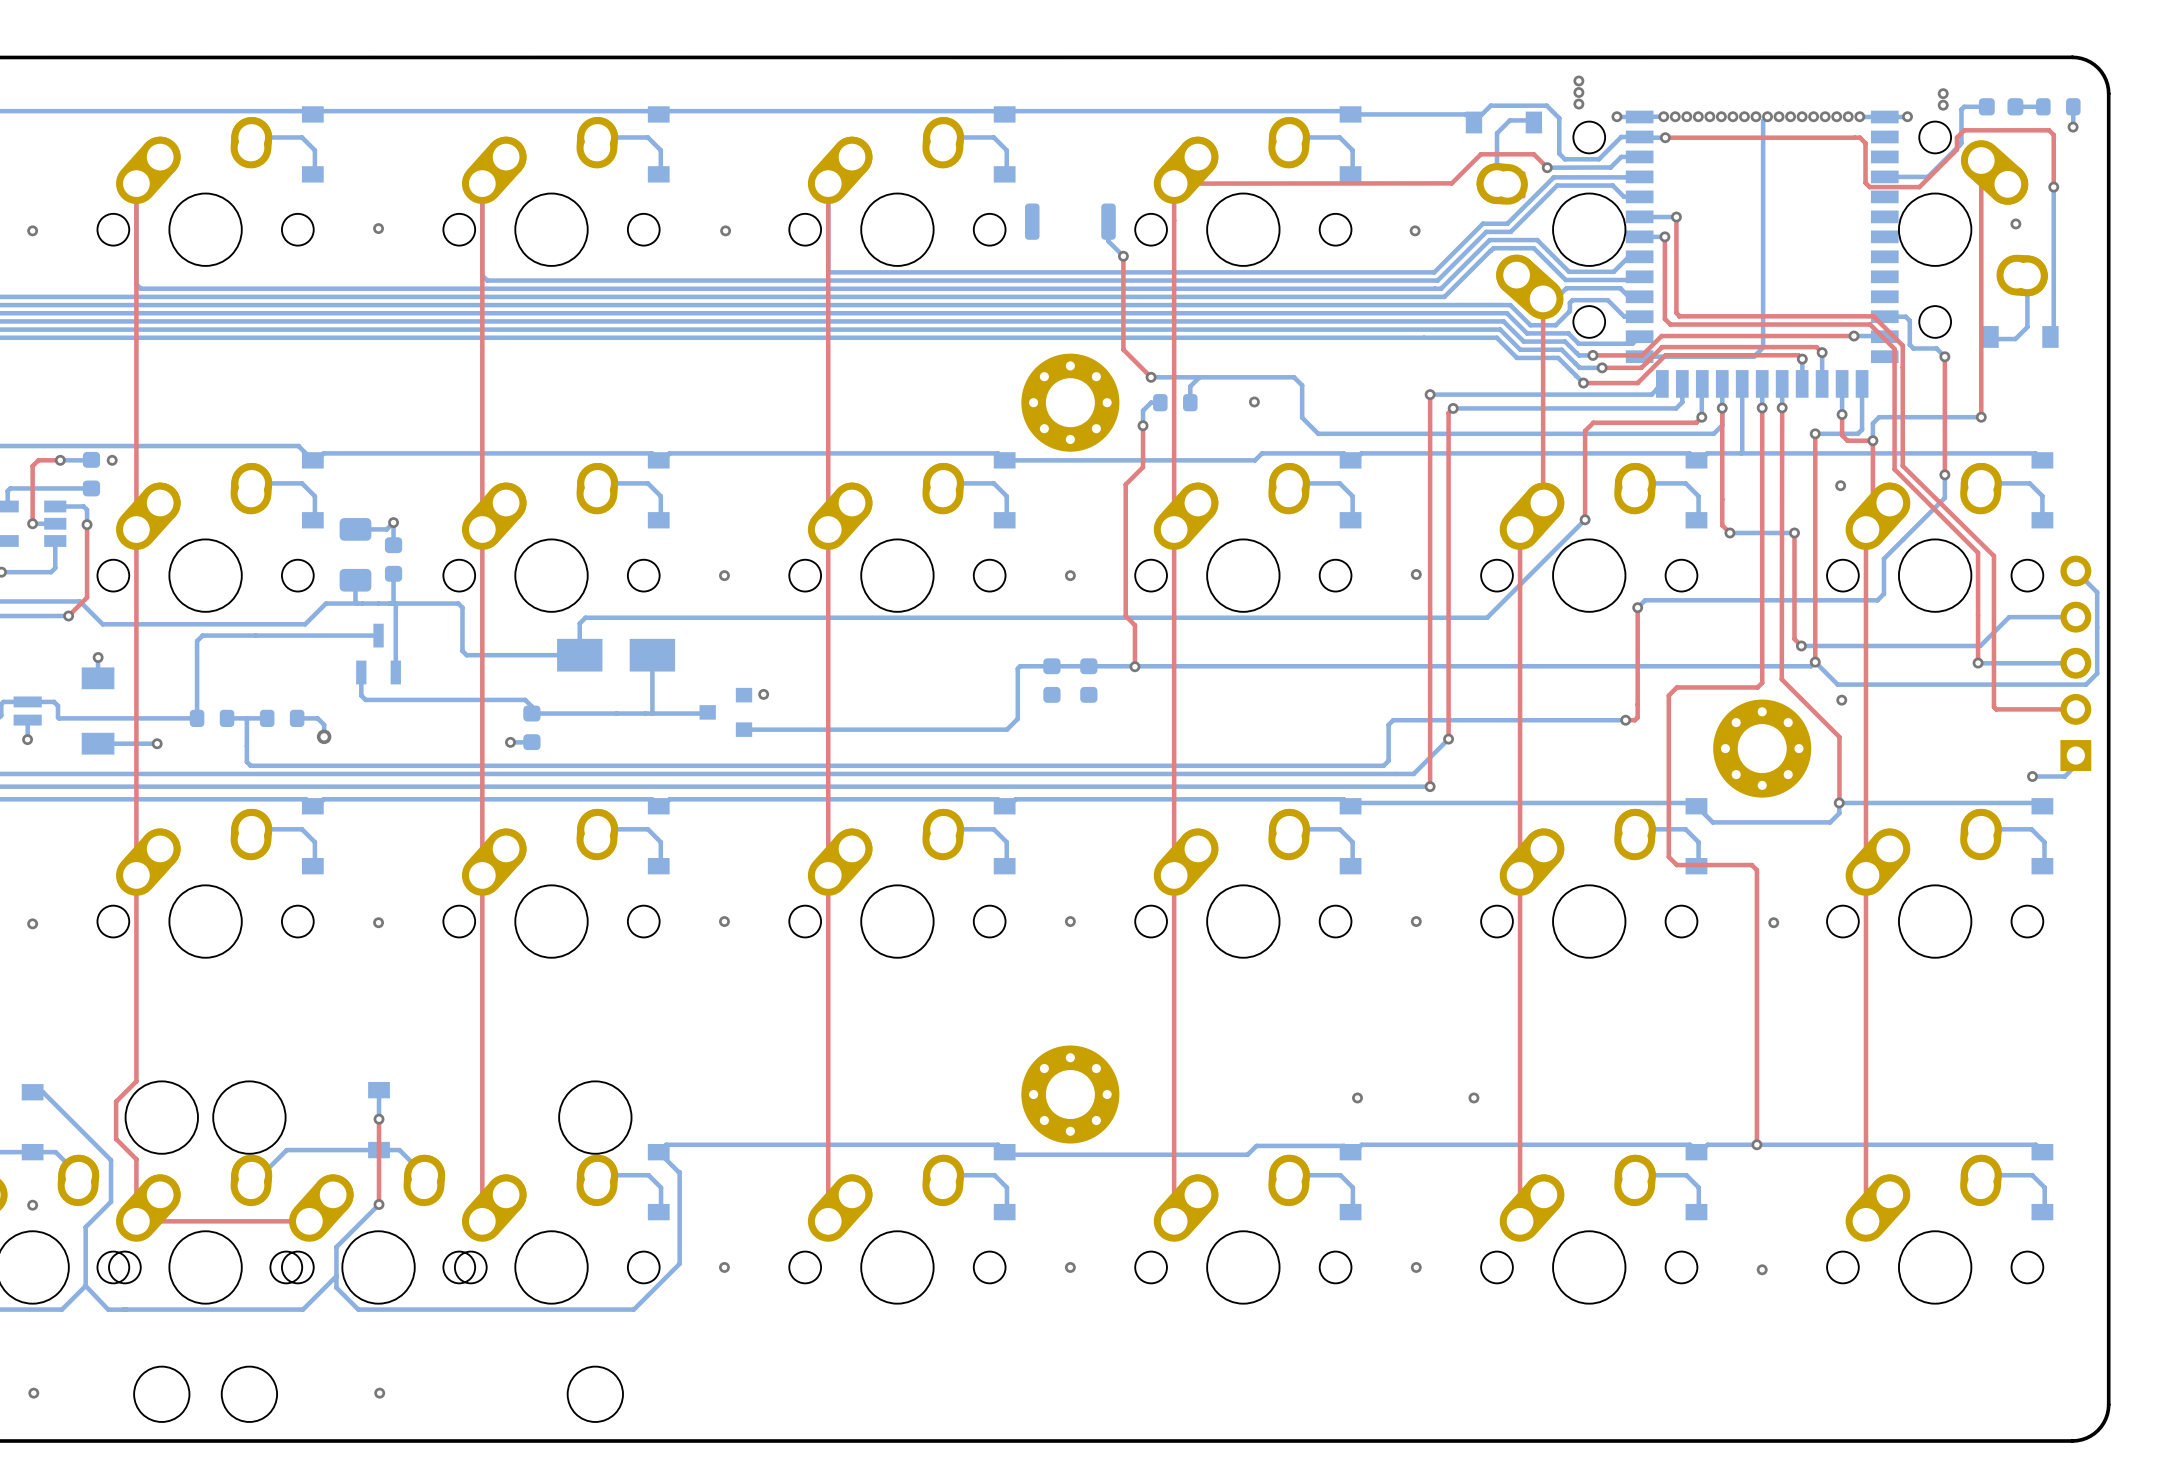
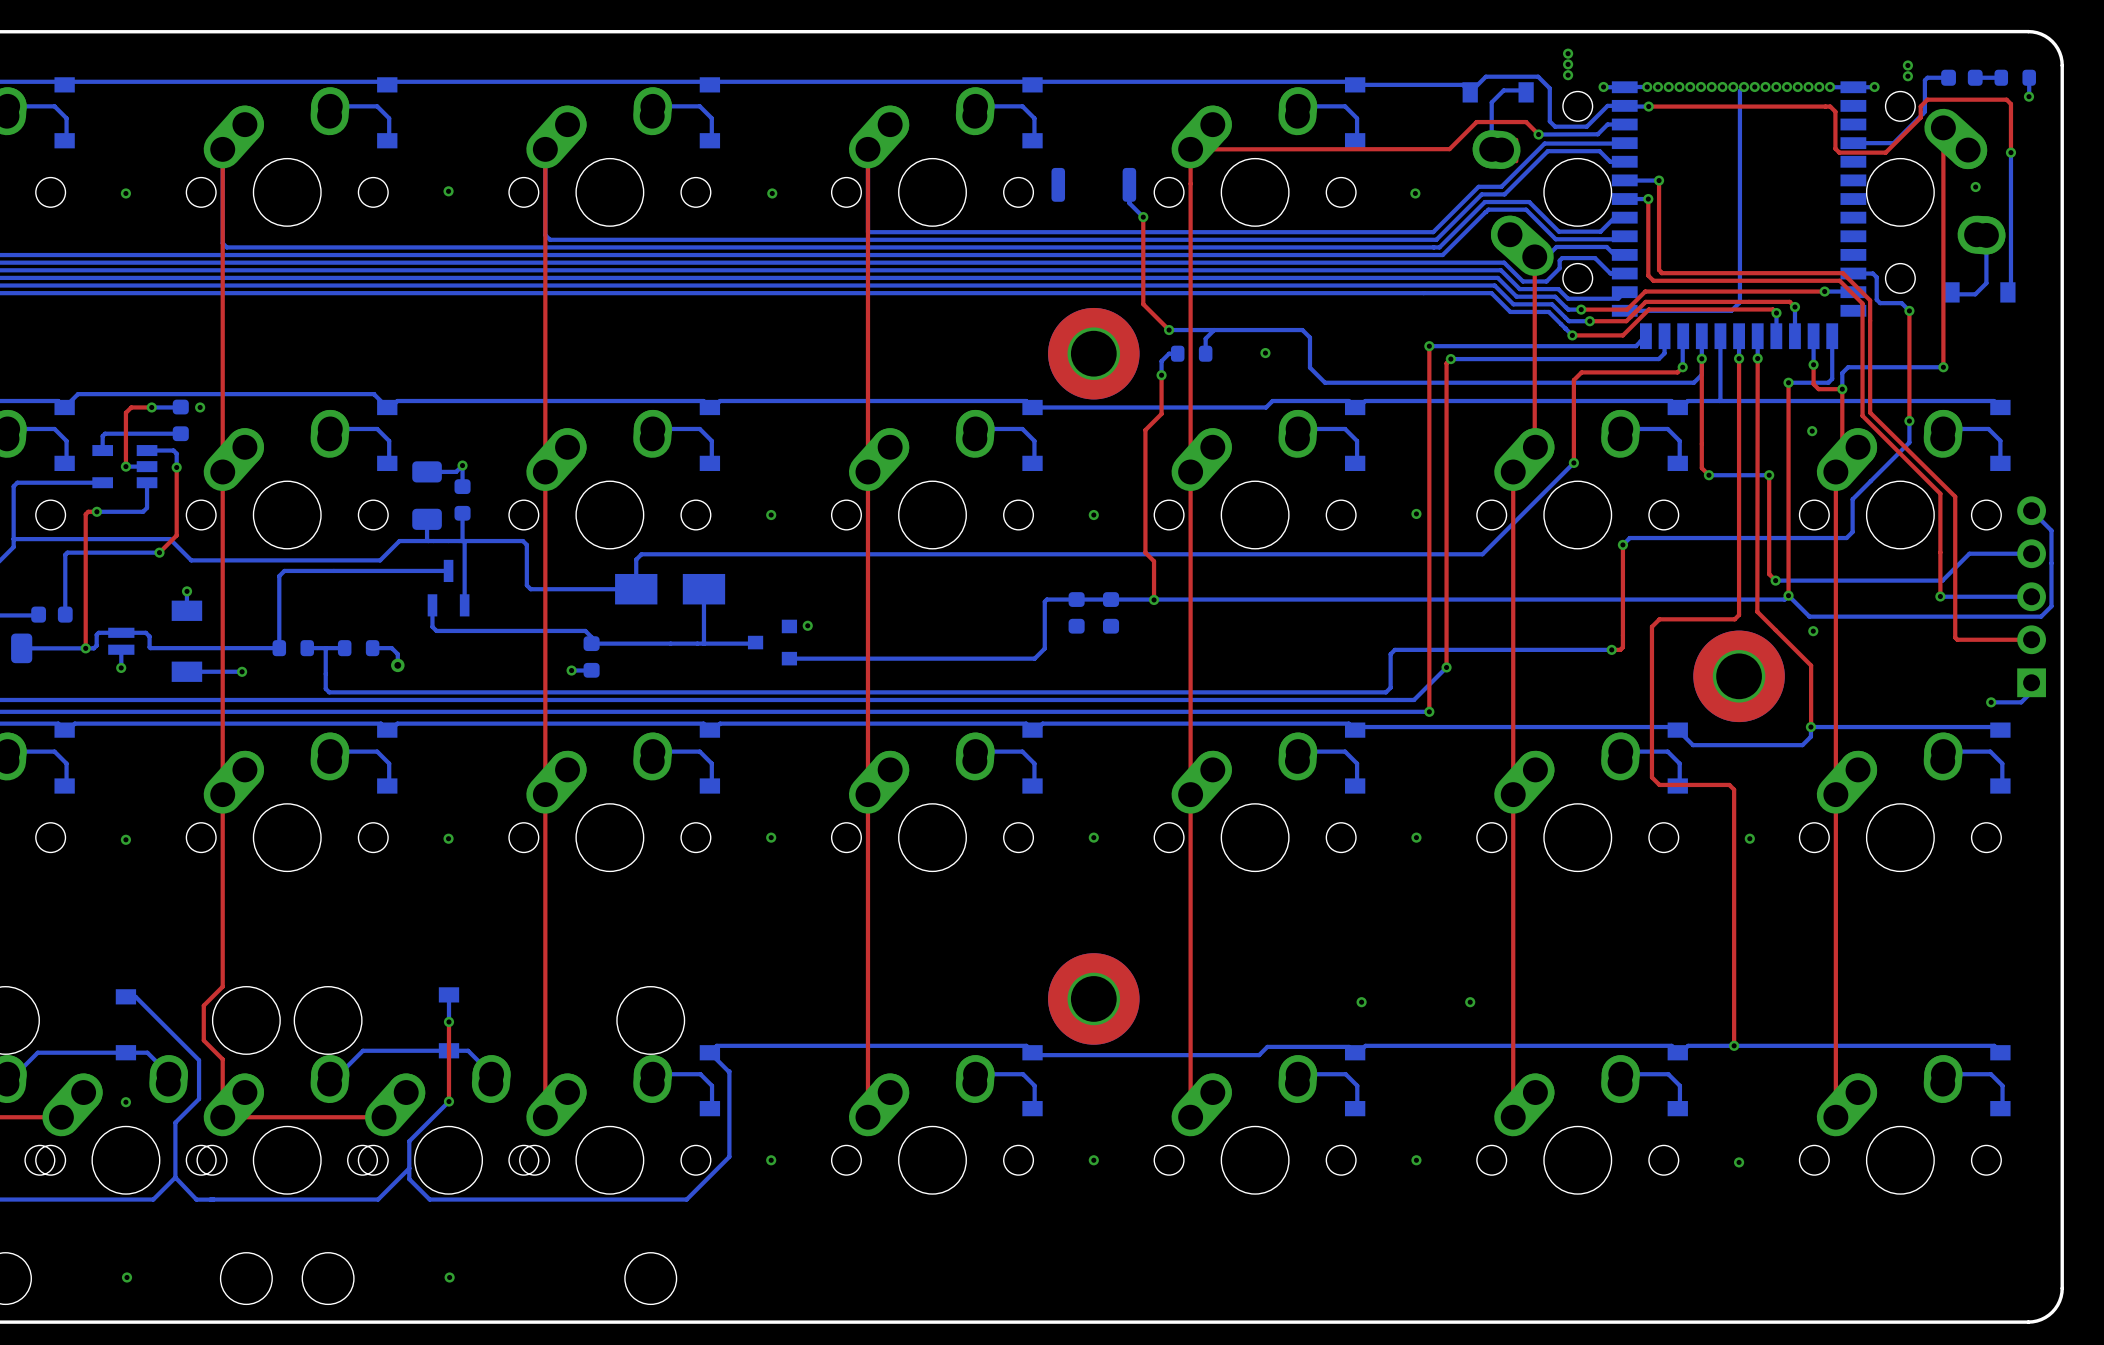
part footprint: [1021, 353, 1120, 452] -> [1048, 307, 1140, 400]
part footprint: [1713, 699, 1812, 798] -> [1693, 630, 1785, 723]
part footprint: [1021, 1045, 1120, 1144] -> [1048, 953, 1140, 1045]

